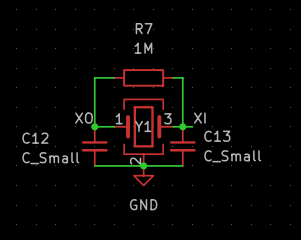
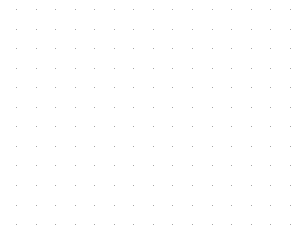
wire: (114, 77) (94, 77) (94, 126) (114, 126) -> none
R7: 1M (143, 77) -> none
wire: (172, 77) (182, 77) (182, 126) -> none
label: XO (83, 118) -> none
label: XI (199, 118) -> none
junction: (94, 126) -> none
wire: (172, 126) (192, 126) -> none
junction: (182, 126) -> none
Y1: (143, 132) -> none
C12: C_Small (94, 146) -> none
C13: C_Small (182, 146) -> none
wire: (94, 165) (182, 165) -> none
junction: (143, 165) -> none
power symbol: GND (143, 175) -> none

